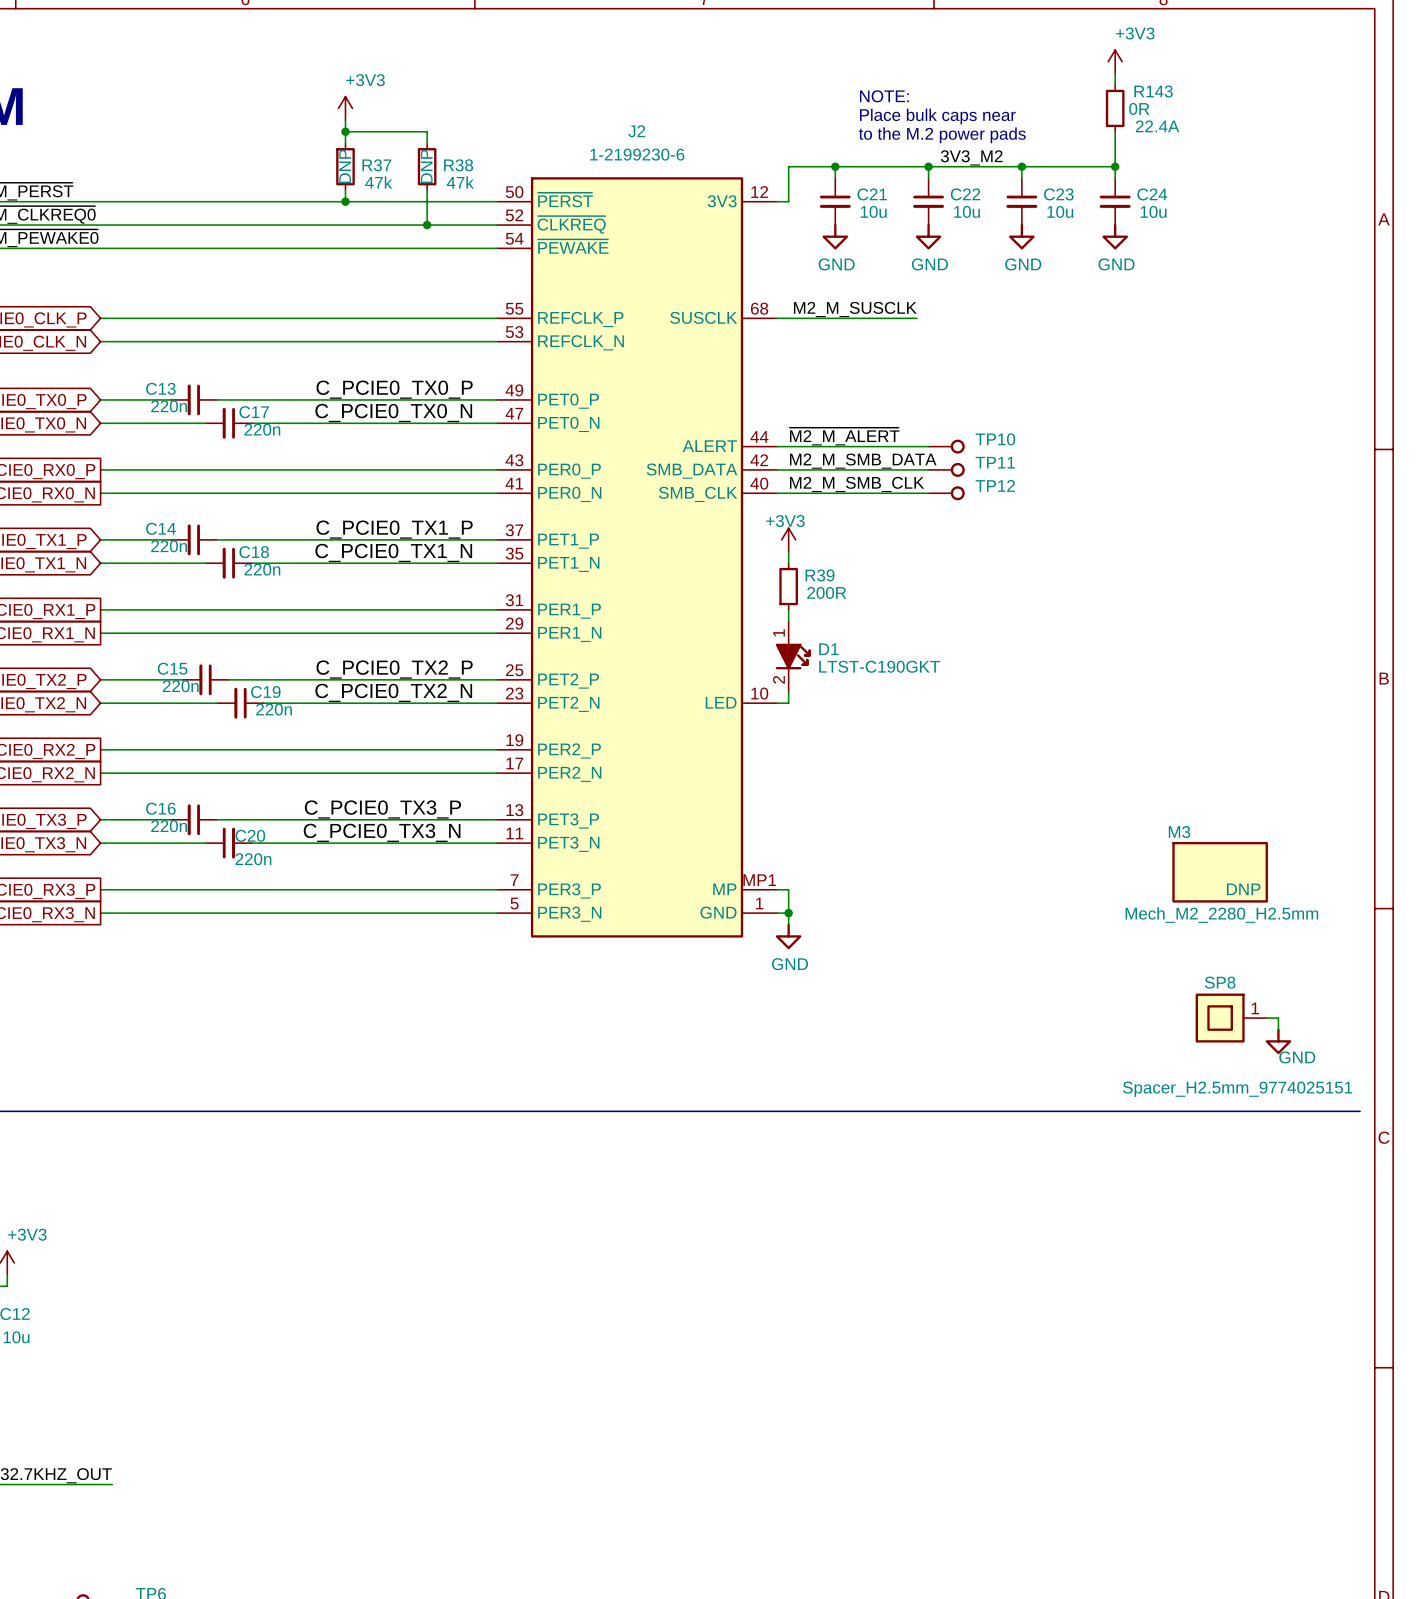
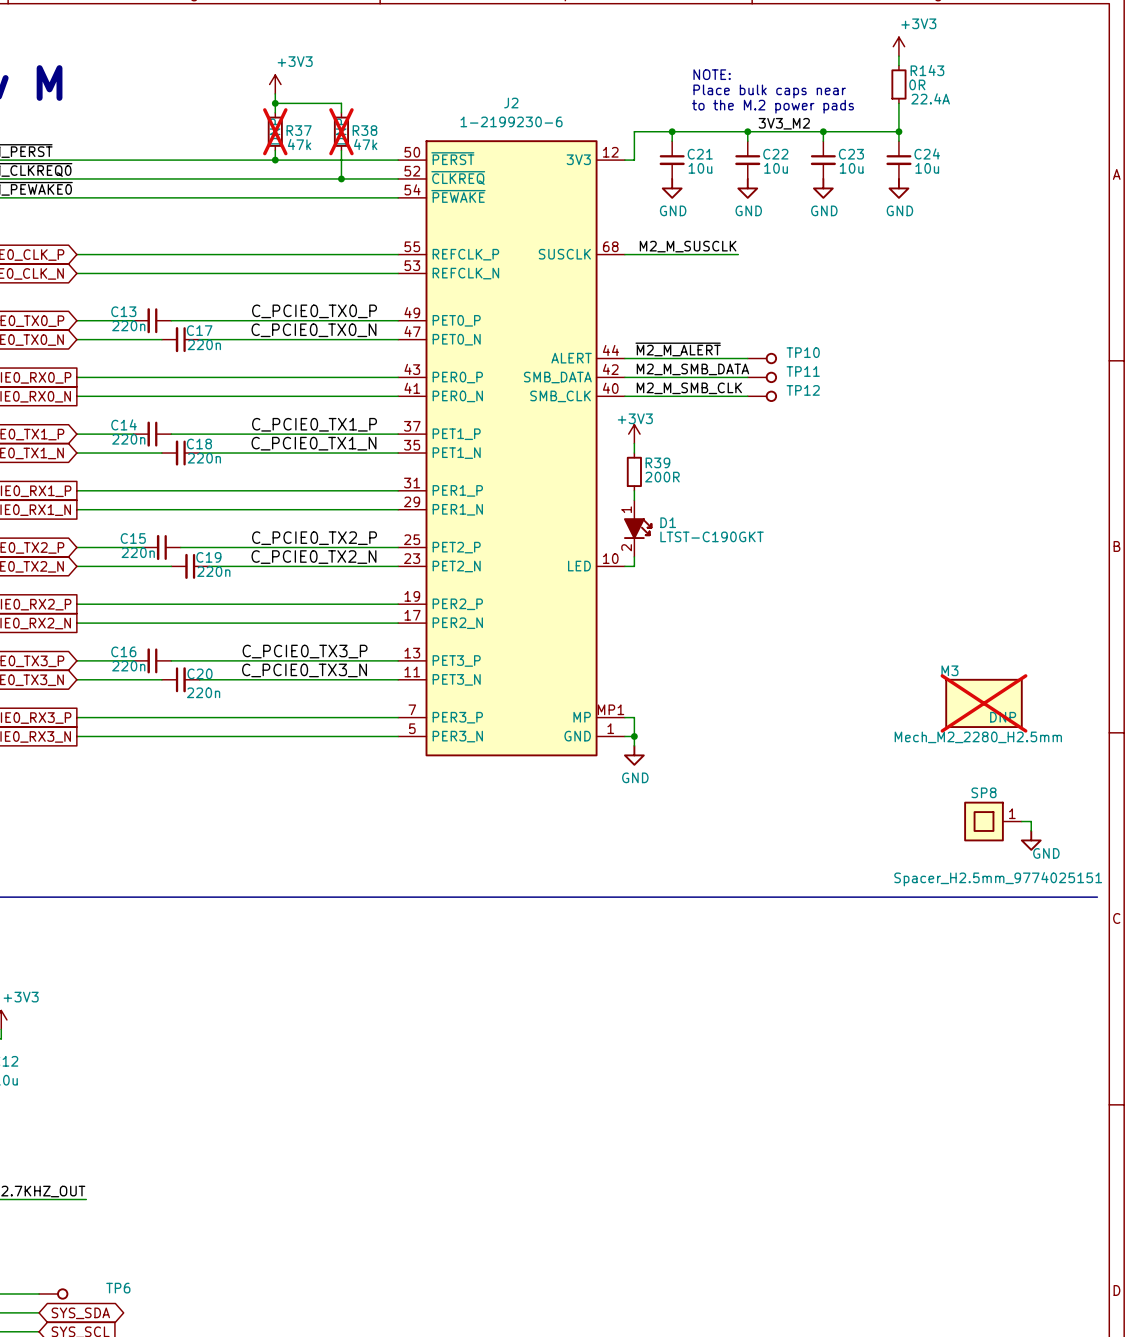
R37 do-not-place cross: none -> (275, 131)
R38 do-not-place cross: none -> (341, 131)
M3 do-not-place cross: none -> (984, 703)

